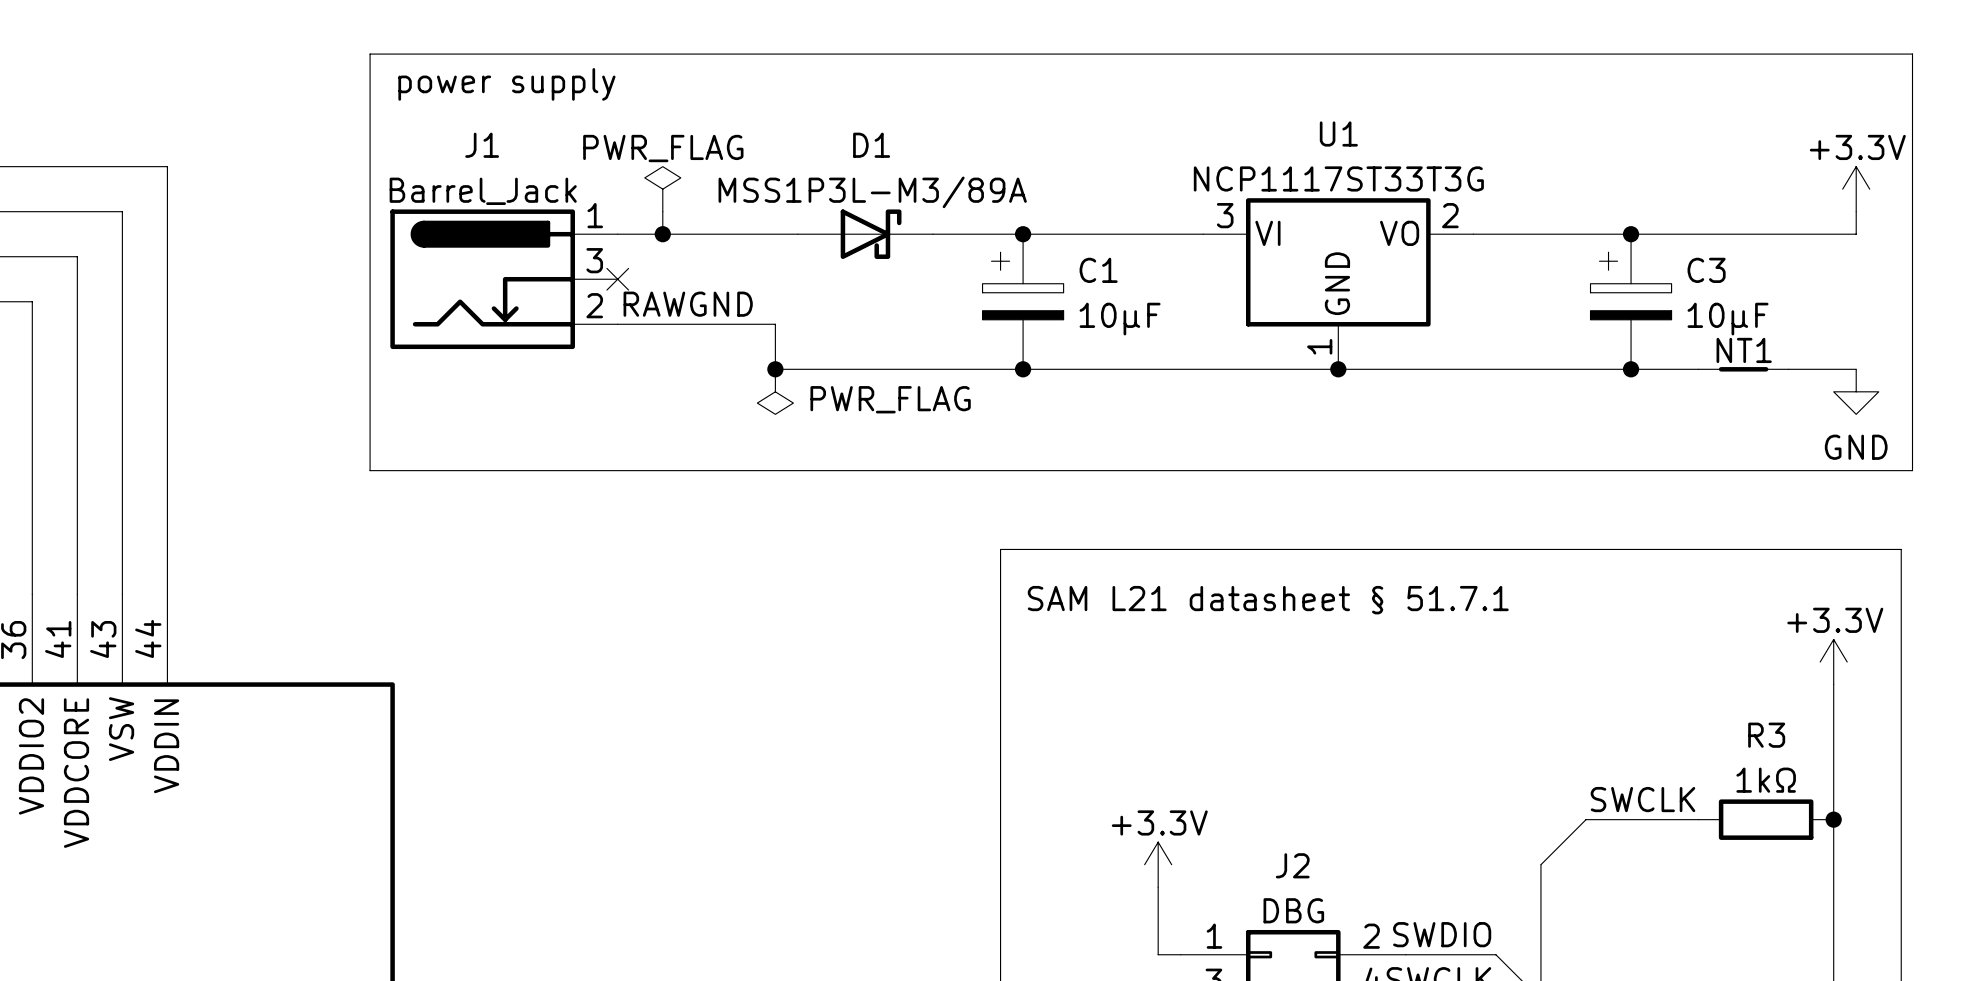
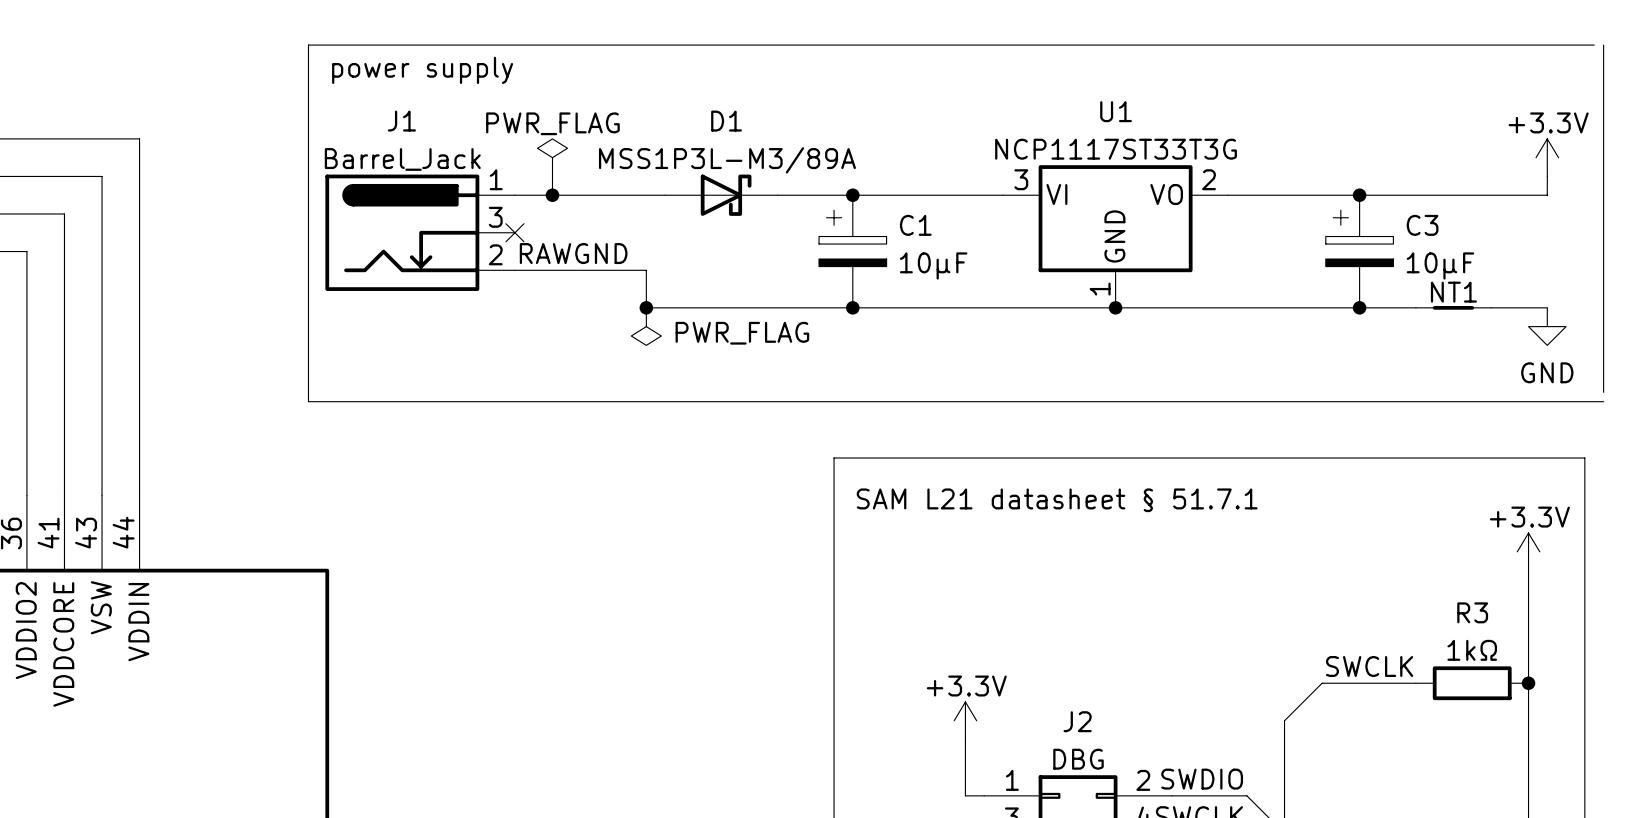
line: (1912, 54) (1912, 470) (370, 470) -> (1603, 401) (308, 401) (308, 392)
line: none -> (1603, 45) (1603, 392)

